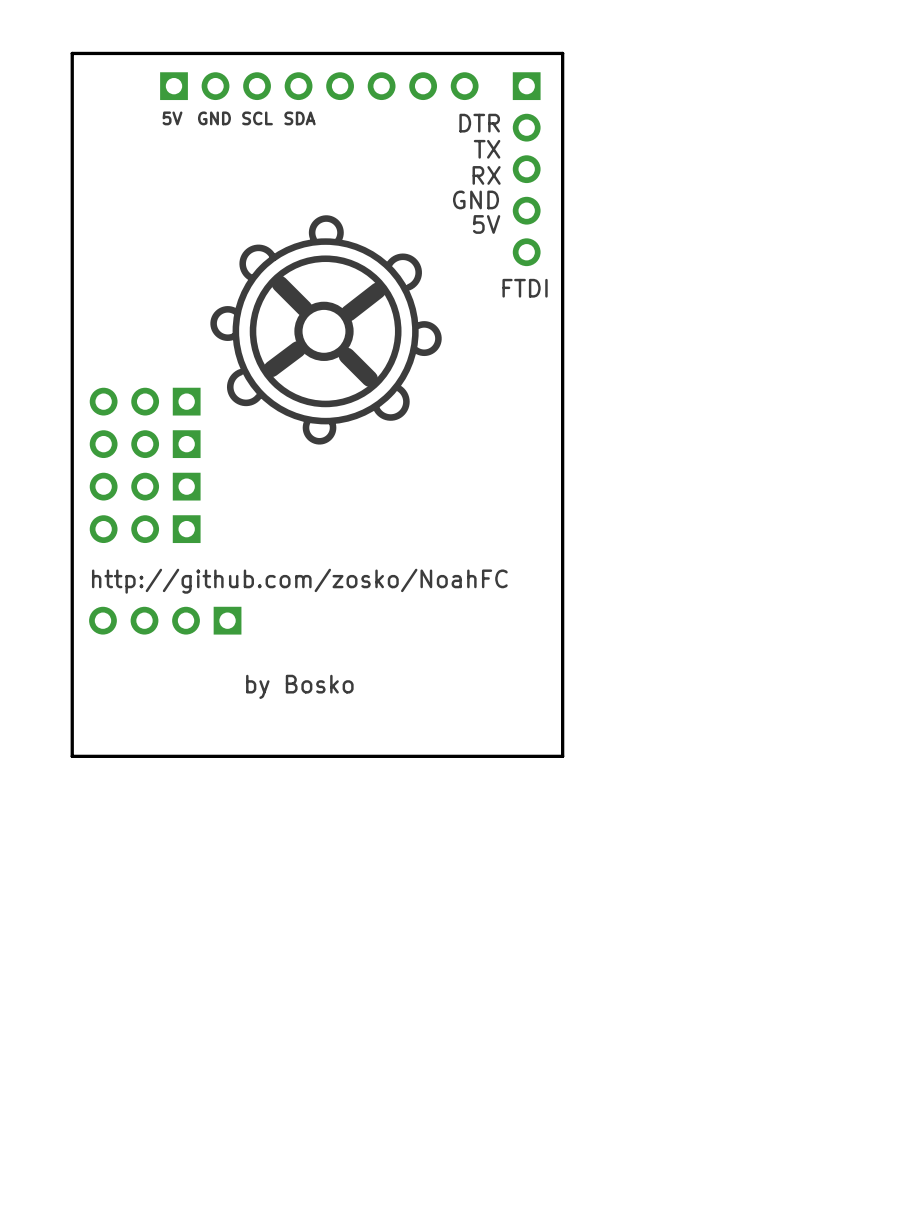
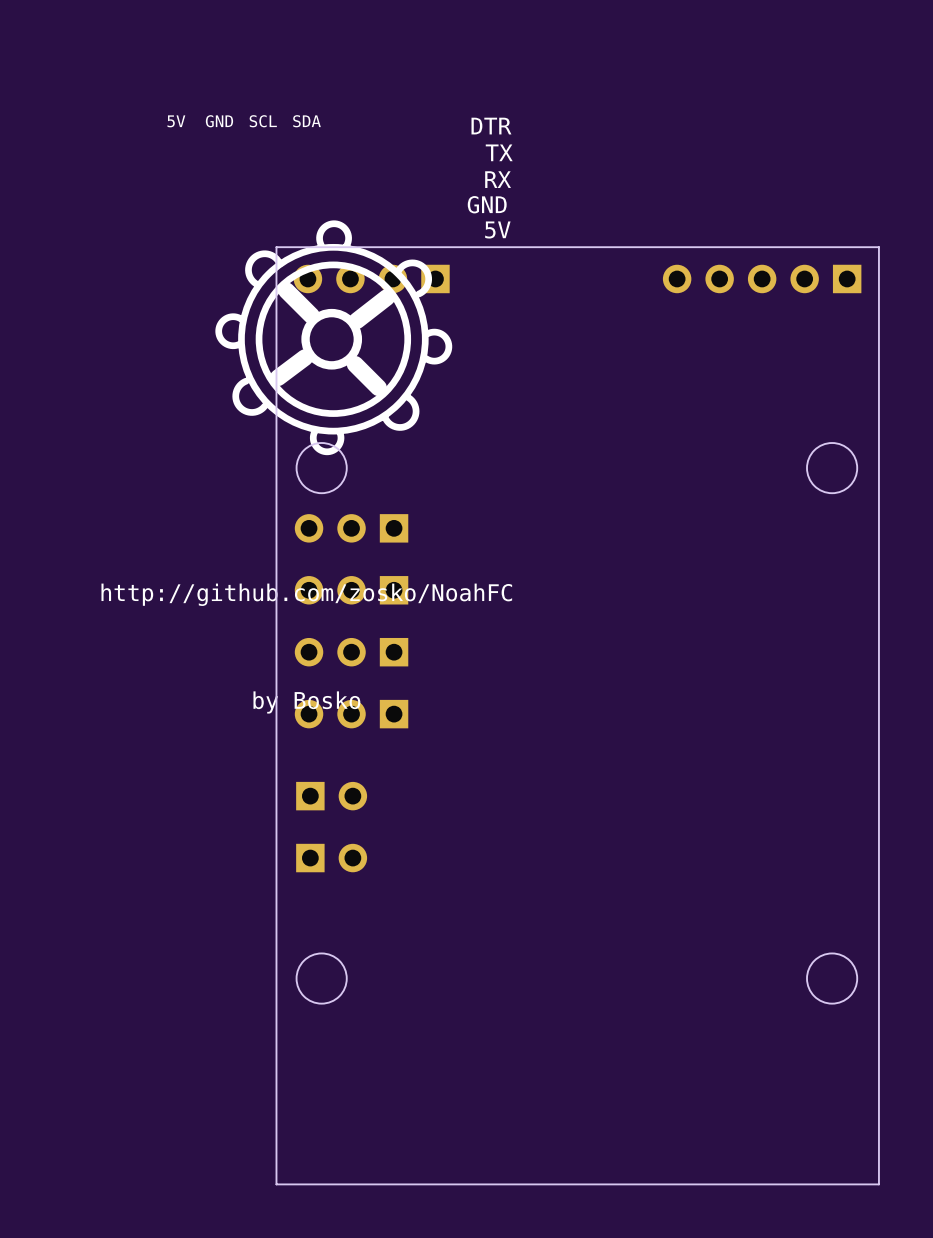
board edge: (562, 53) (72, 53) (72, 756) (562, 756) (562, 53) -> none
part: (319, 86) -> none
part: FTDI (526, 169) -> none
board edge: none -> (878, 247) (276, 247) (276, 1184) (878, 1184) (878, 247)
part: none -> (762, 278)
part: (145, 401) -> none
round board edge: none -> [295, 442, 348, 495]
round board edge: none -> [806, 442, 859, 495]
part: (145, 444) -> none
part: (145, 486) -> none
part: none -> (351, 528)
part: (145, 529) -> none
part: none -> (351, 590)
part position: (165, 620) -> (371, 278)
part: none -> (351, 652)
part: none -> (351, 714)
part: none -> (331, 796)
part: none -> (331, 858)
round board edge: none -> [295, 952, 348, 1005]
round board edge: none -> [806, 952, 859, 1005]

